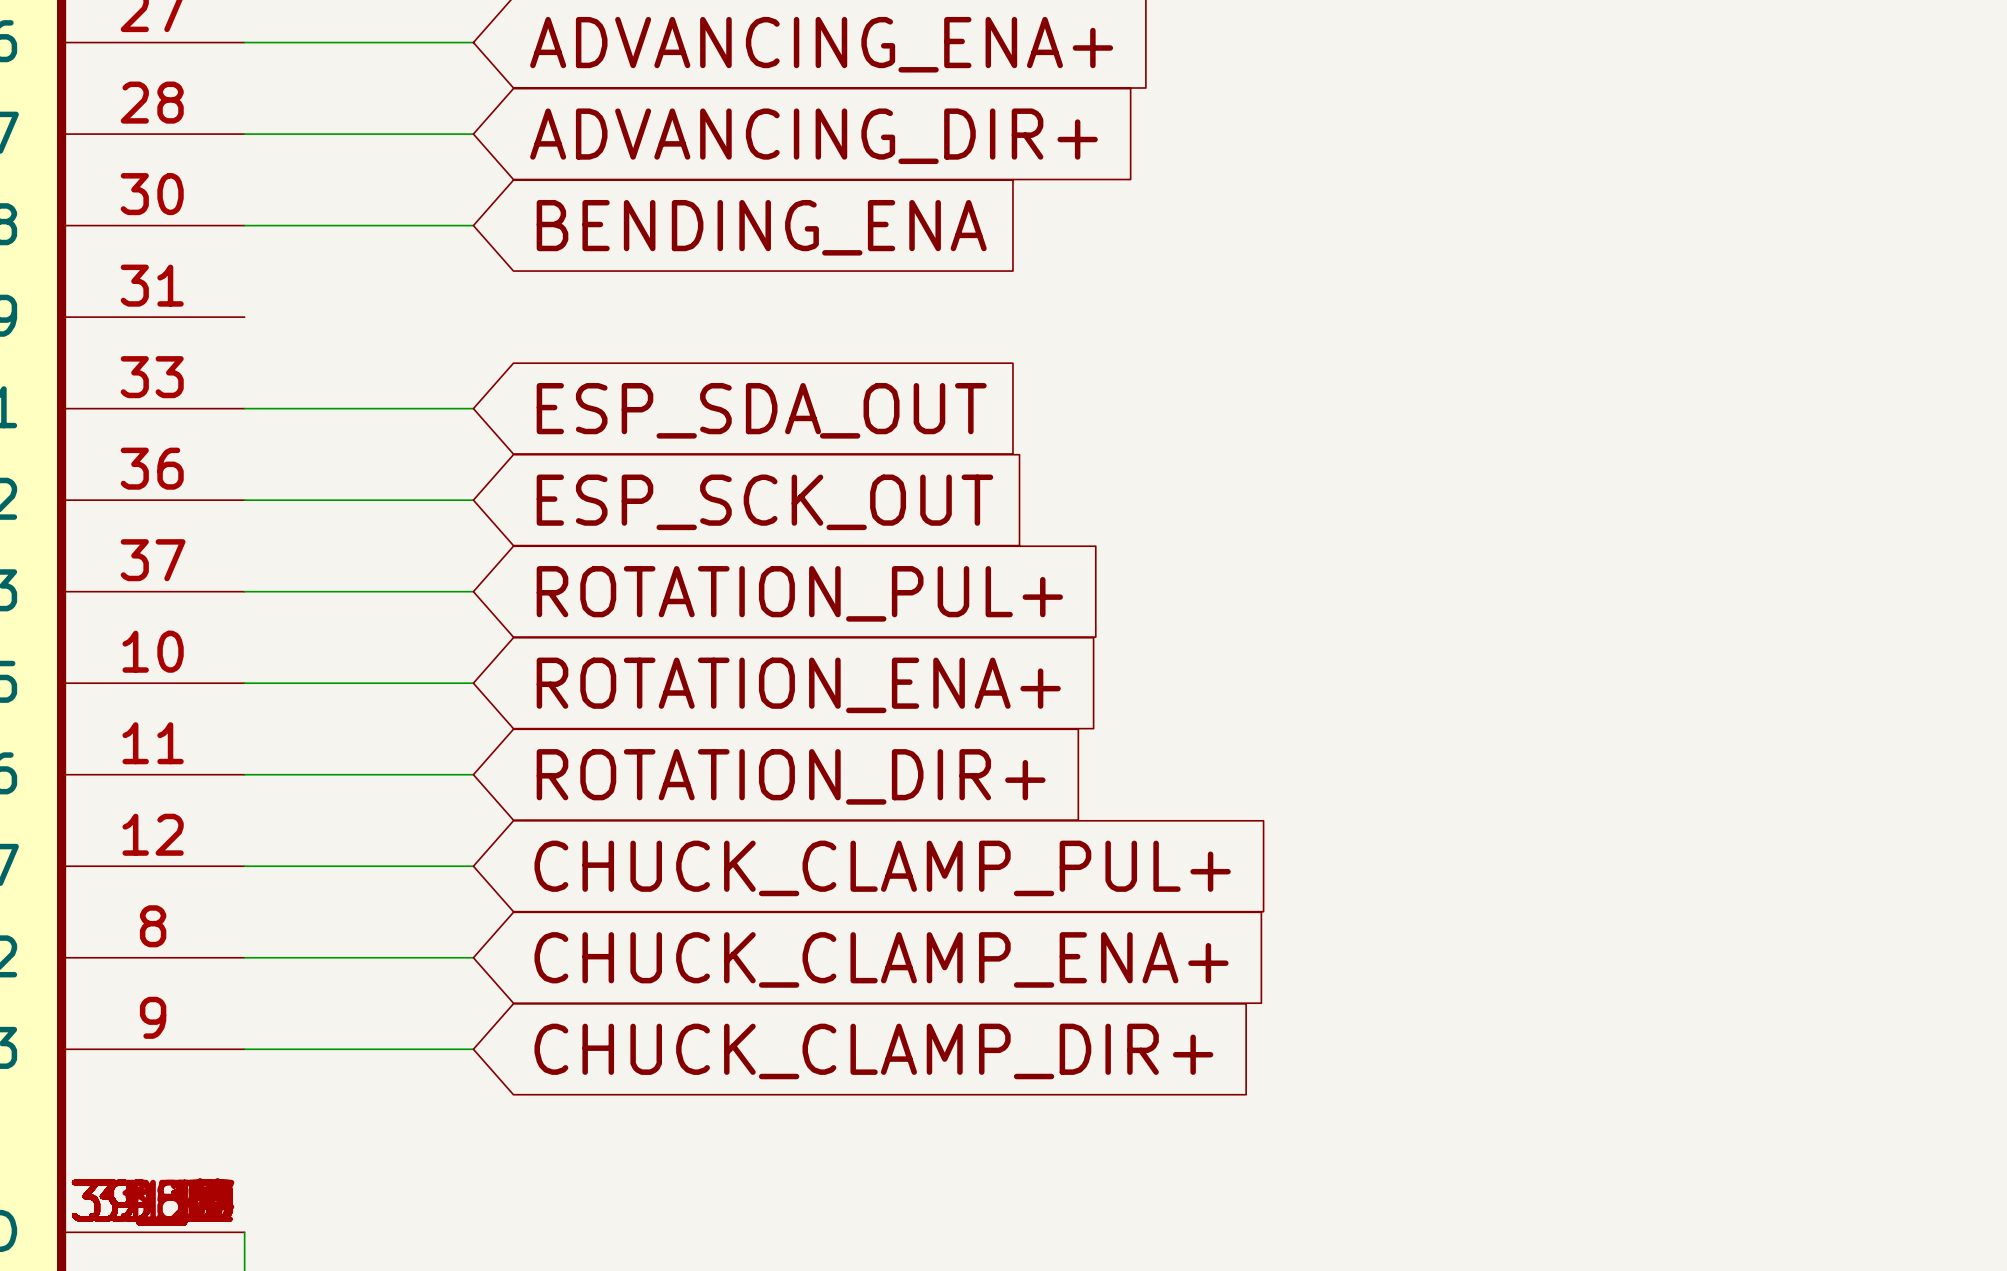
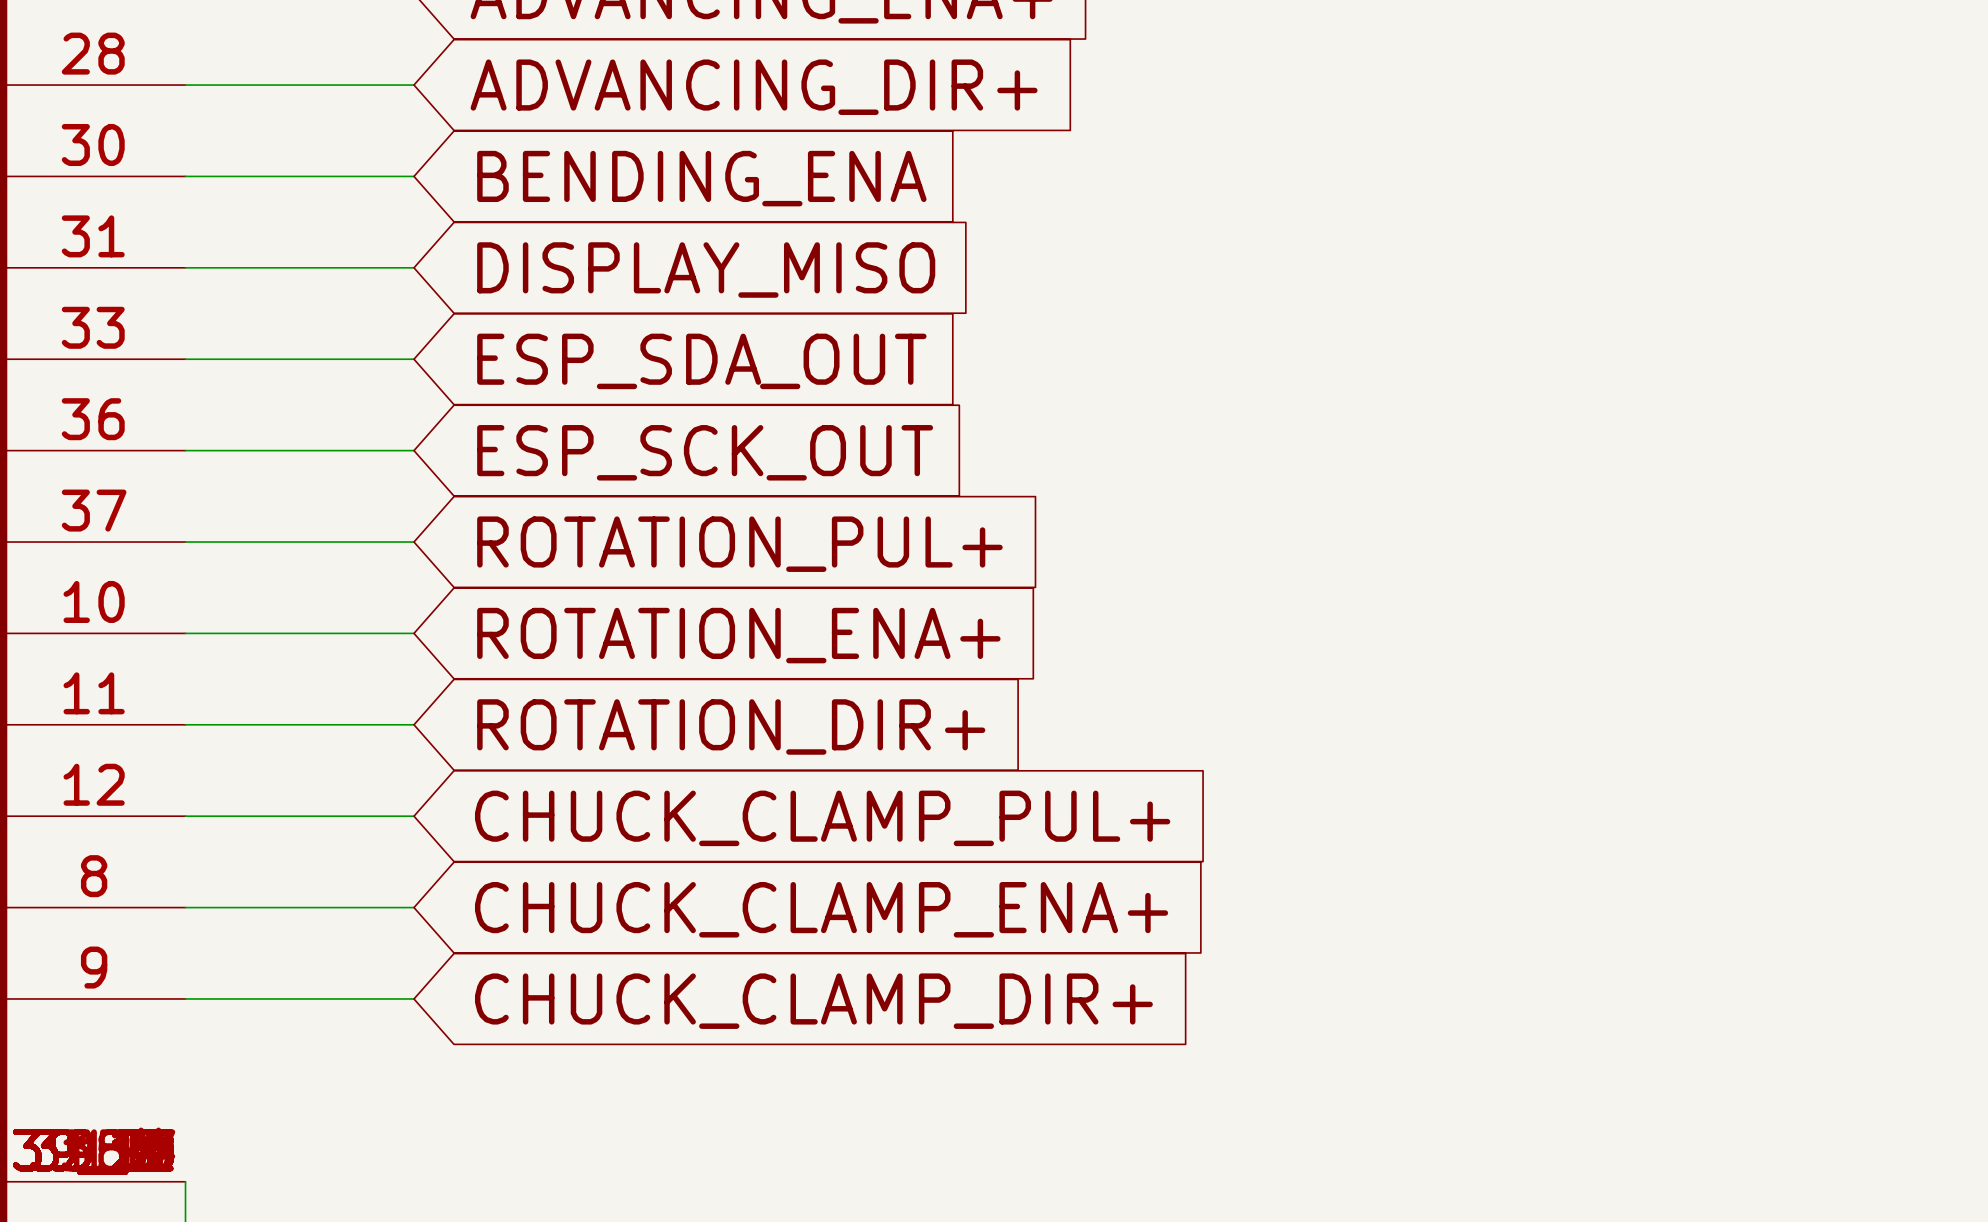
wire: none -> (185, 267) (414, 267)
global label: none -> DISPLAY_MISO (706, 270)

